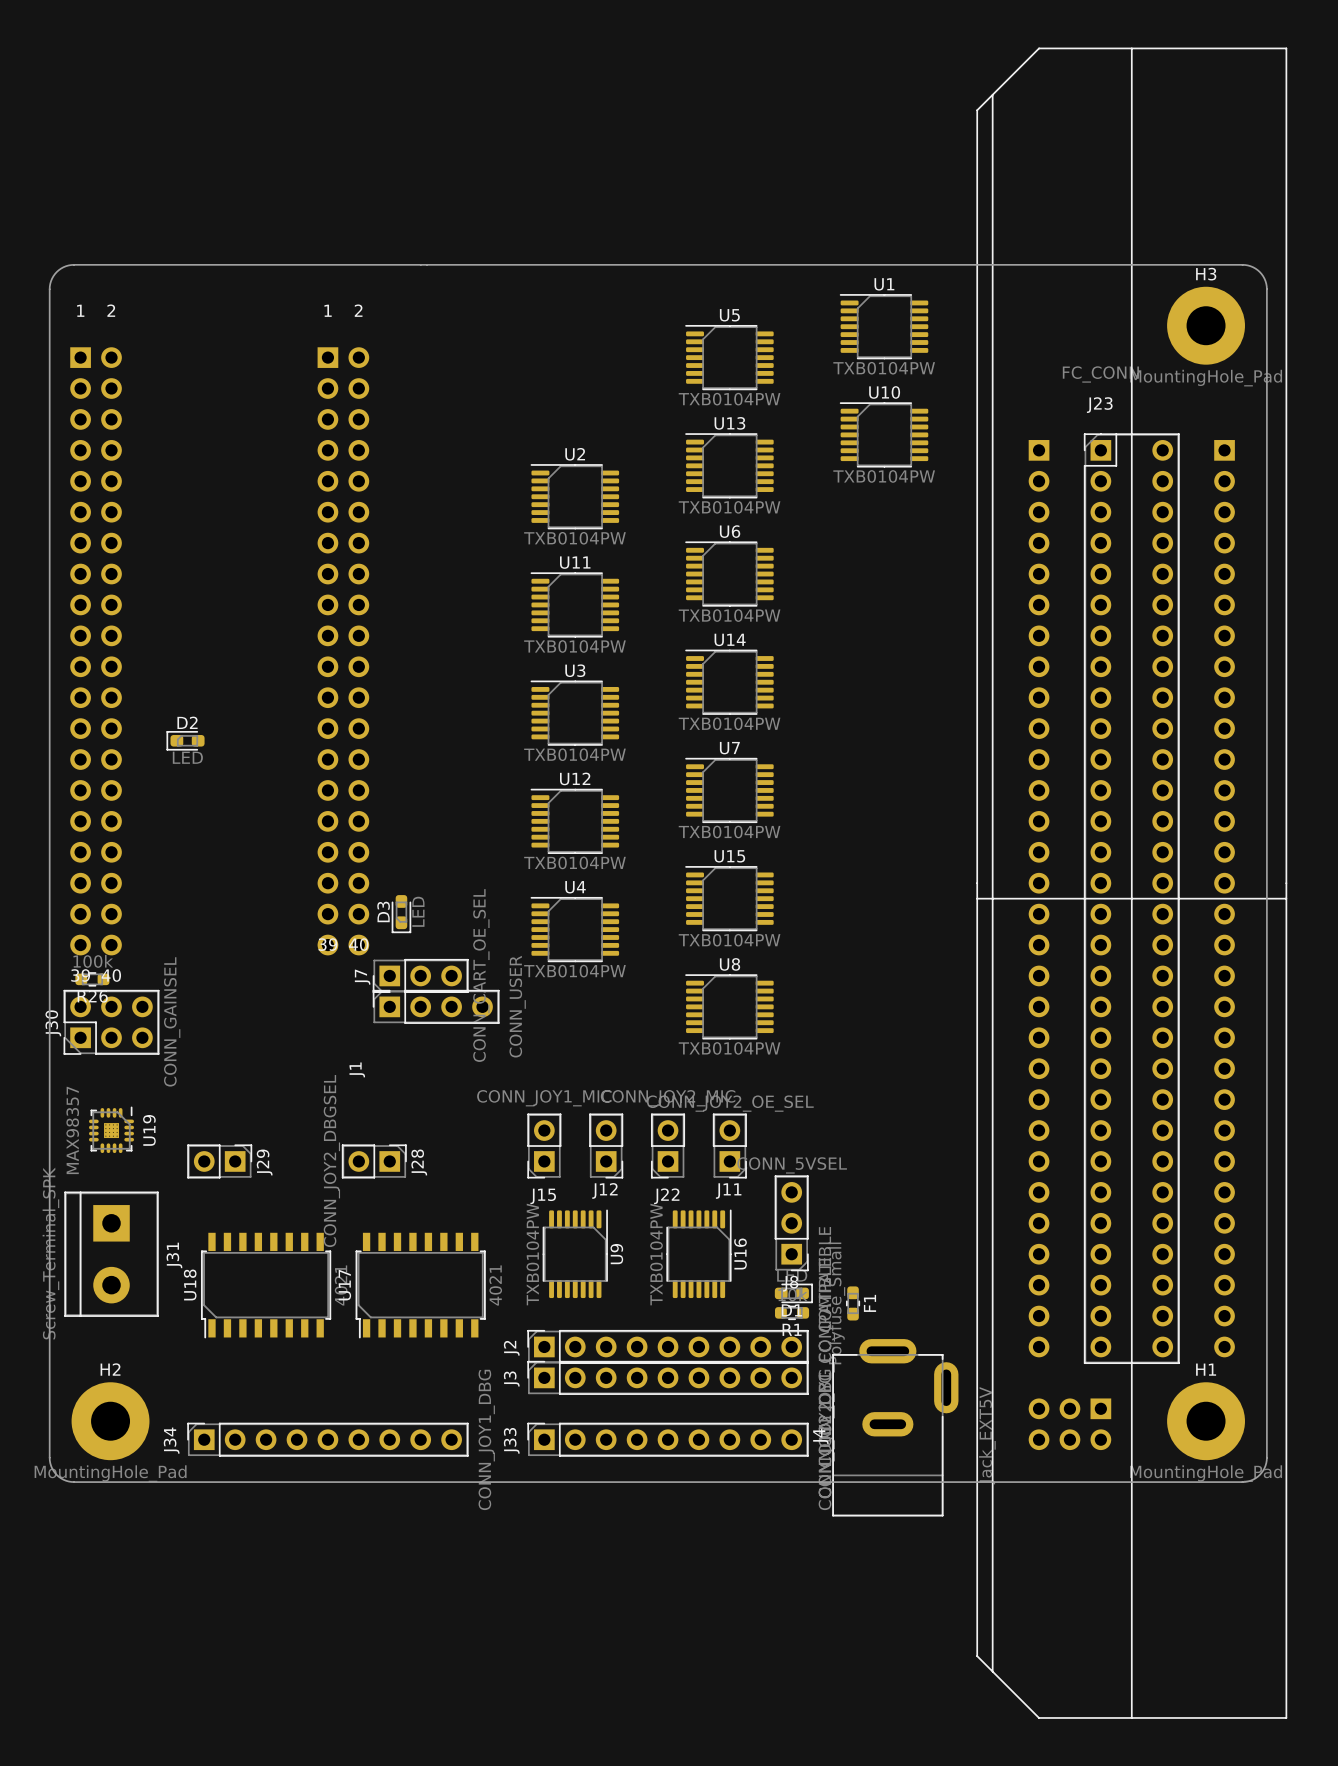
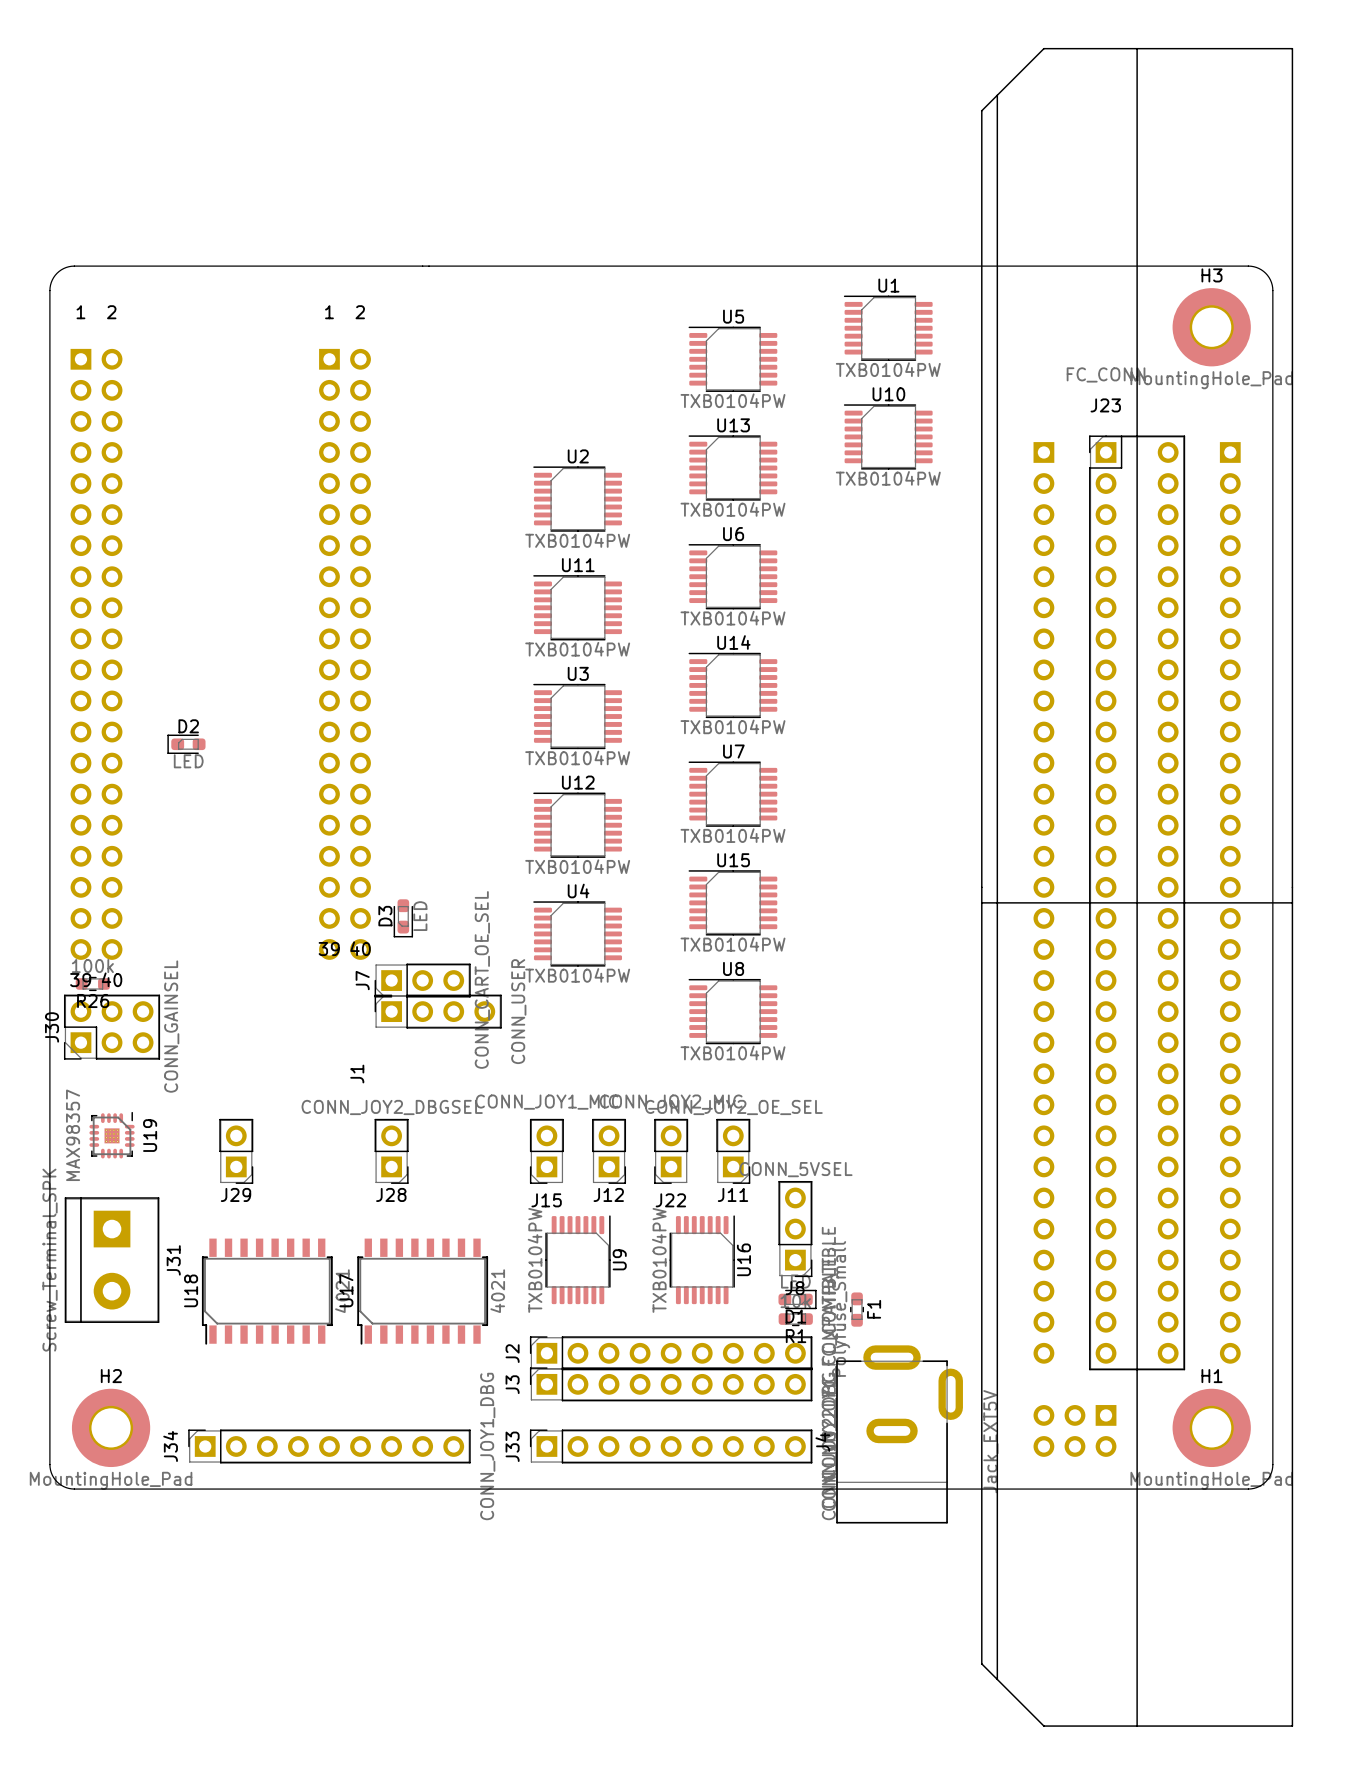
J29 rotation: 0° (219, 1161) -> 90° clockwise (236, 1151)
J28 rotation: 0° (374, 1161) -> 90° clockwise (391, 1151)

